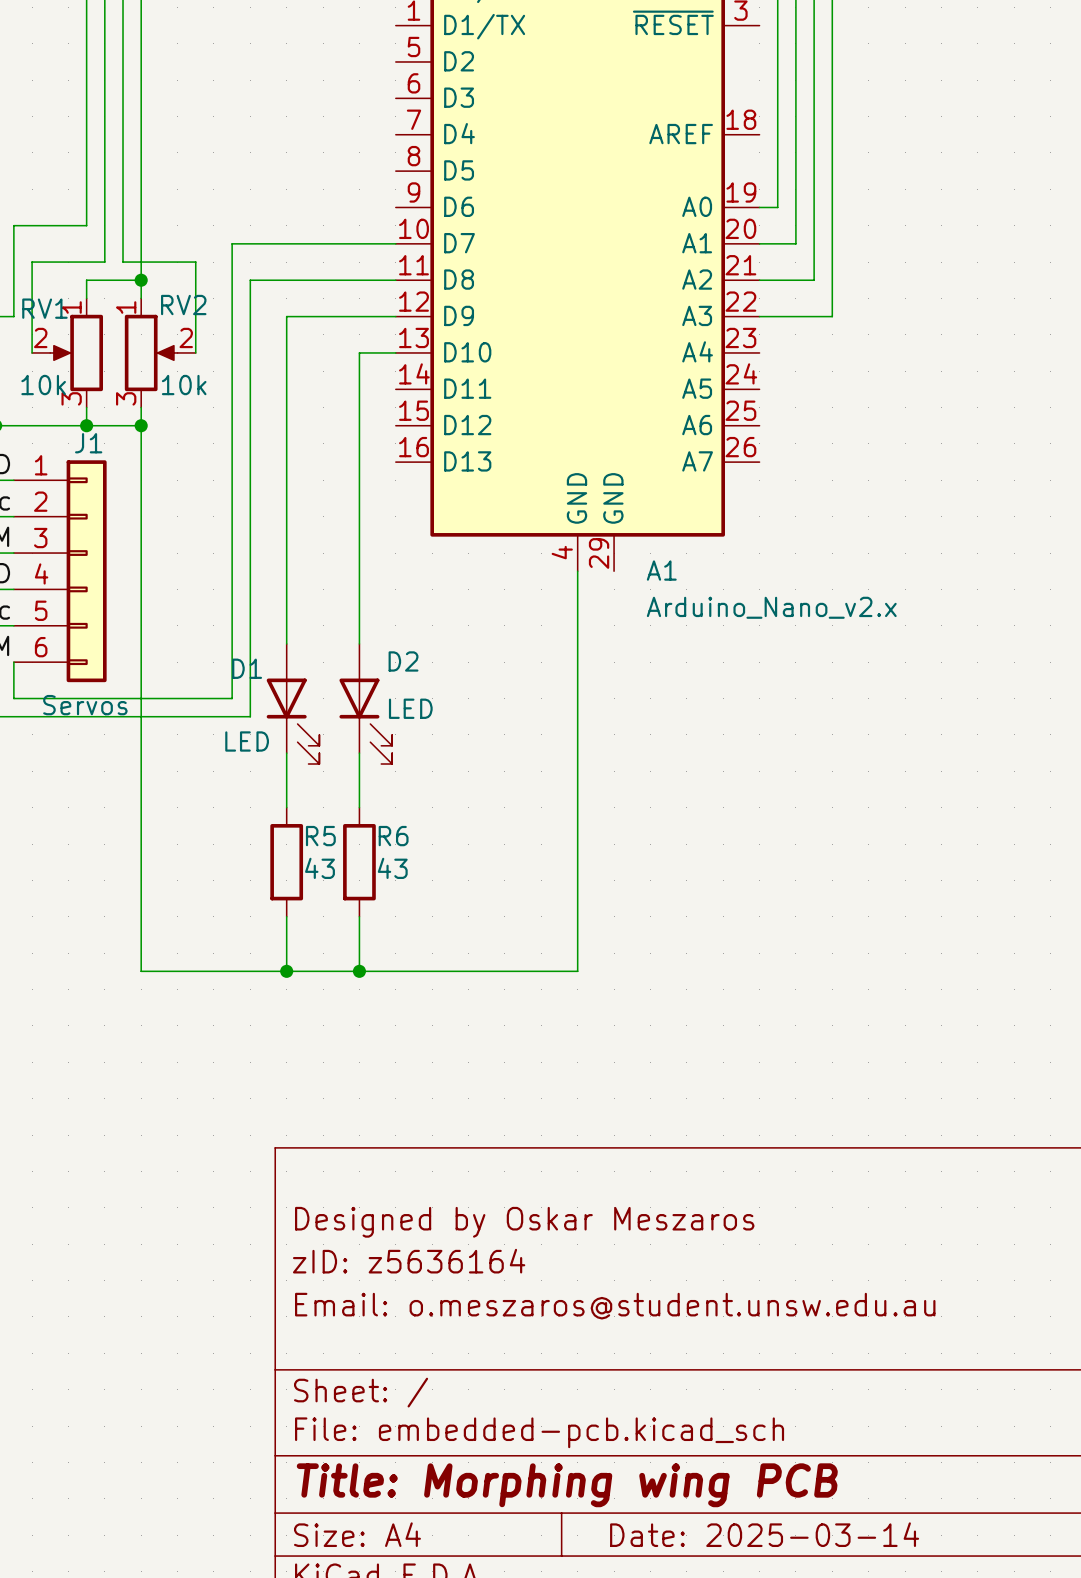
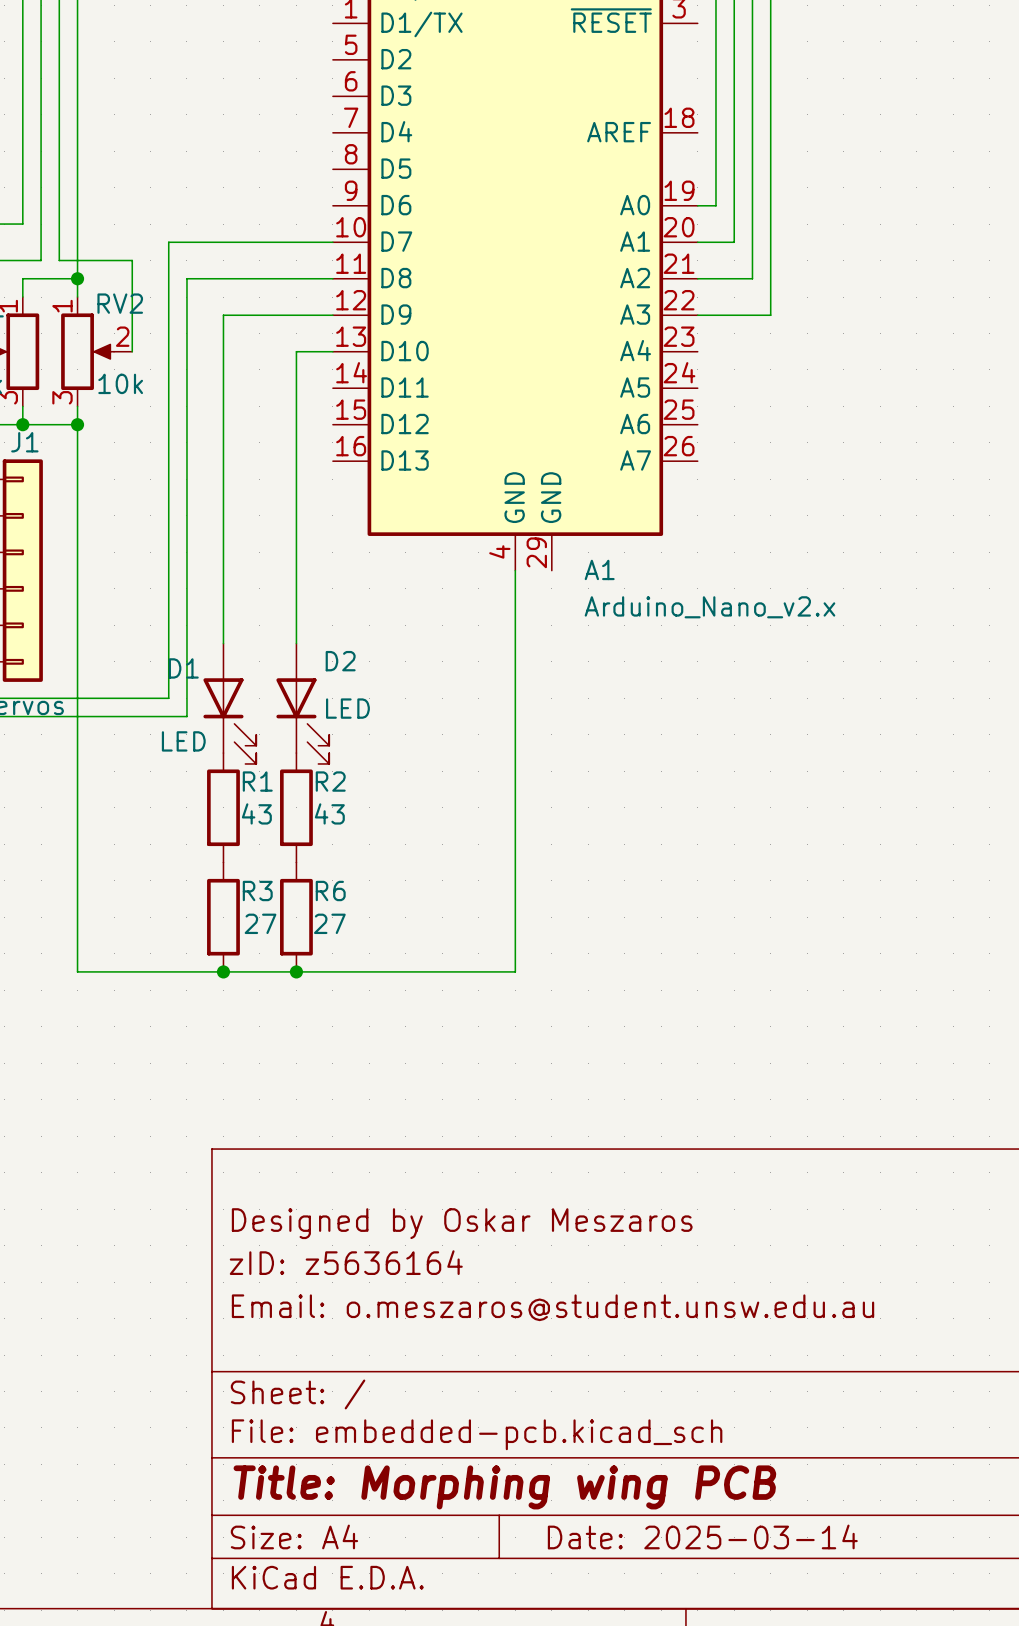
wire: (286, 753) (286, 807) -> none
wire: (359, 753) (359, 807) -> none
R1: none -> 43 (223, 807)
R2: none -> 43 (296, 807)
R5: 43 (286, 862) -> none
R6 position: (359, 862) -> (296, 917)
R6 value: 43 (392, 868) -> 27 (329, 923)
wire: (286, 916) (286, 971) -> none
R3: none -> 27 (223, 917)
wire: (359, 916) (359, 971) -> none

